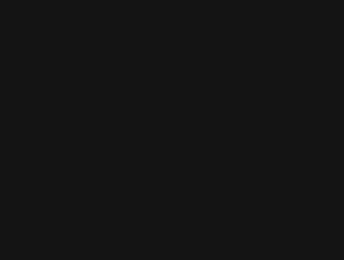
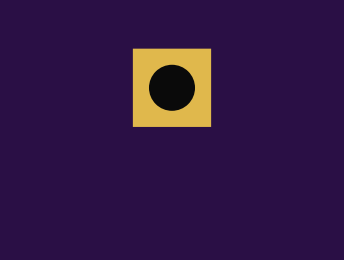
part: none -> (171, 87)

